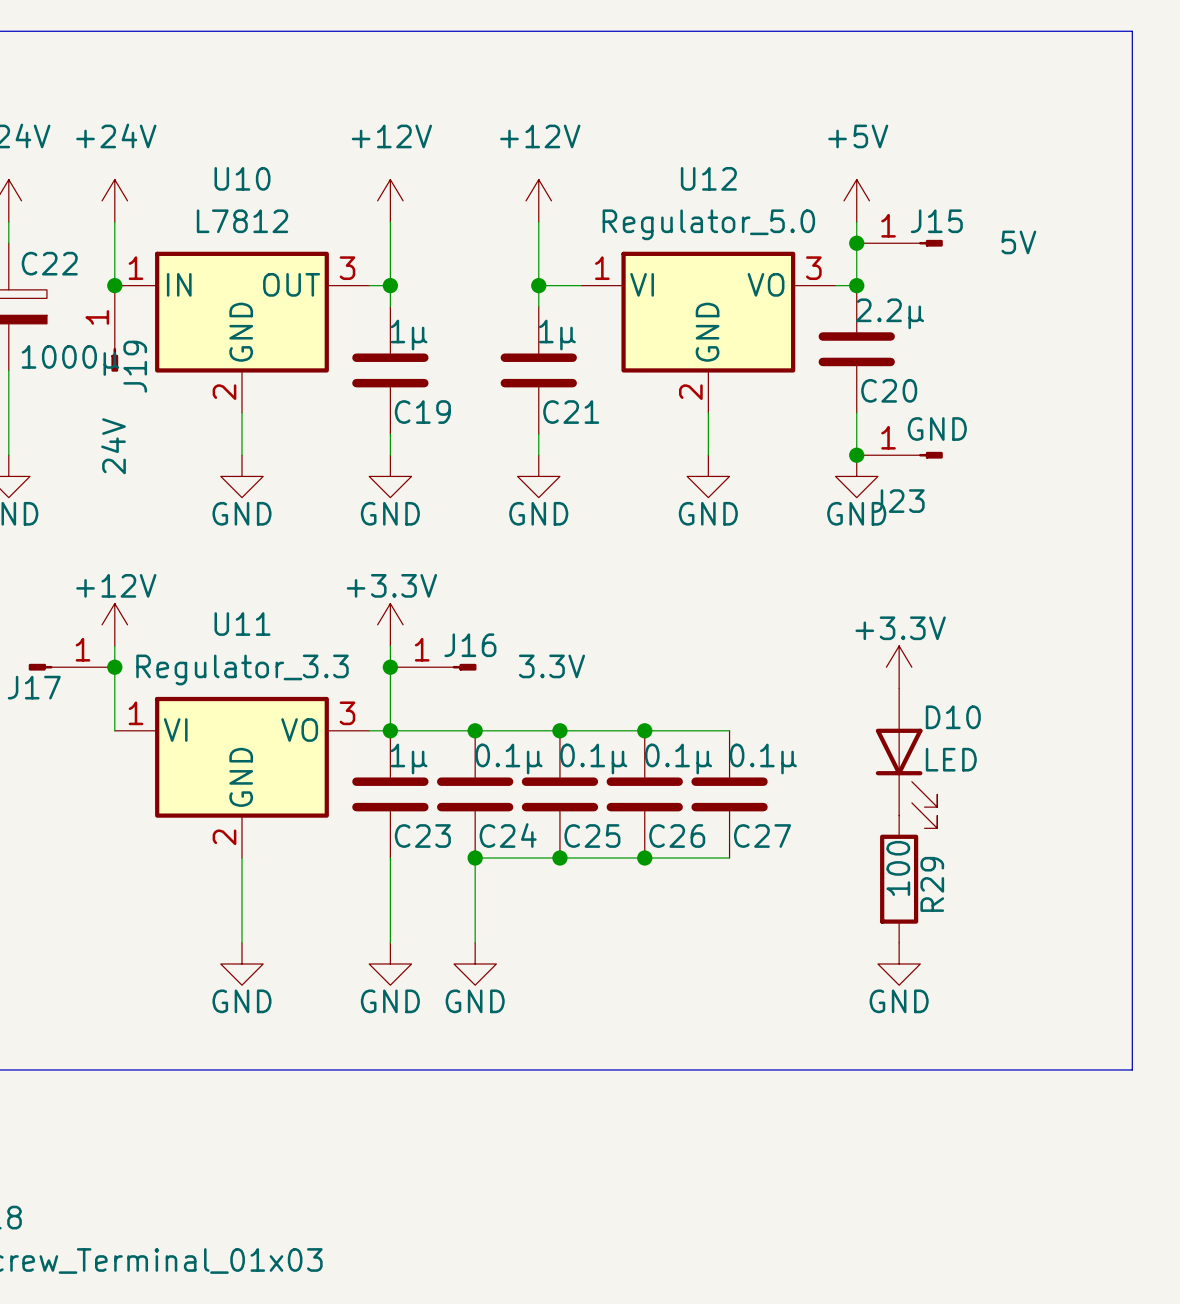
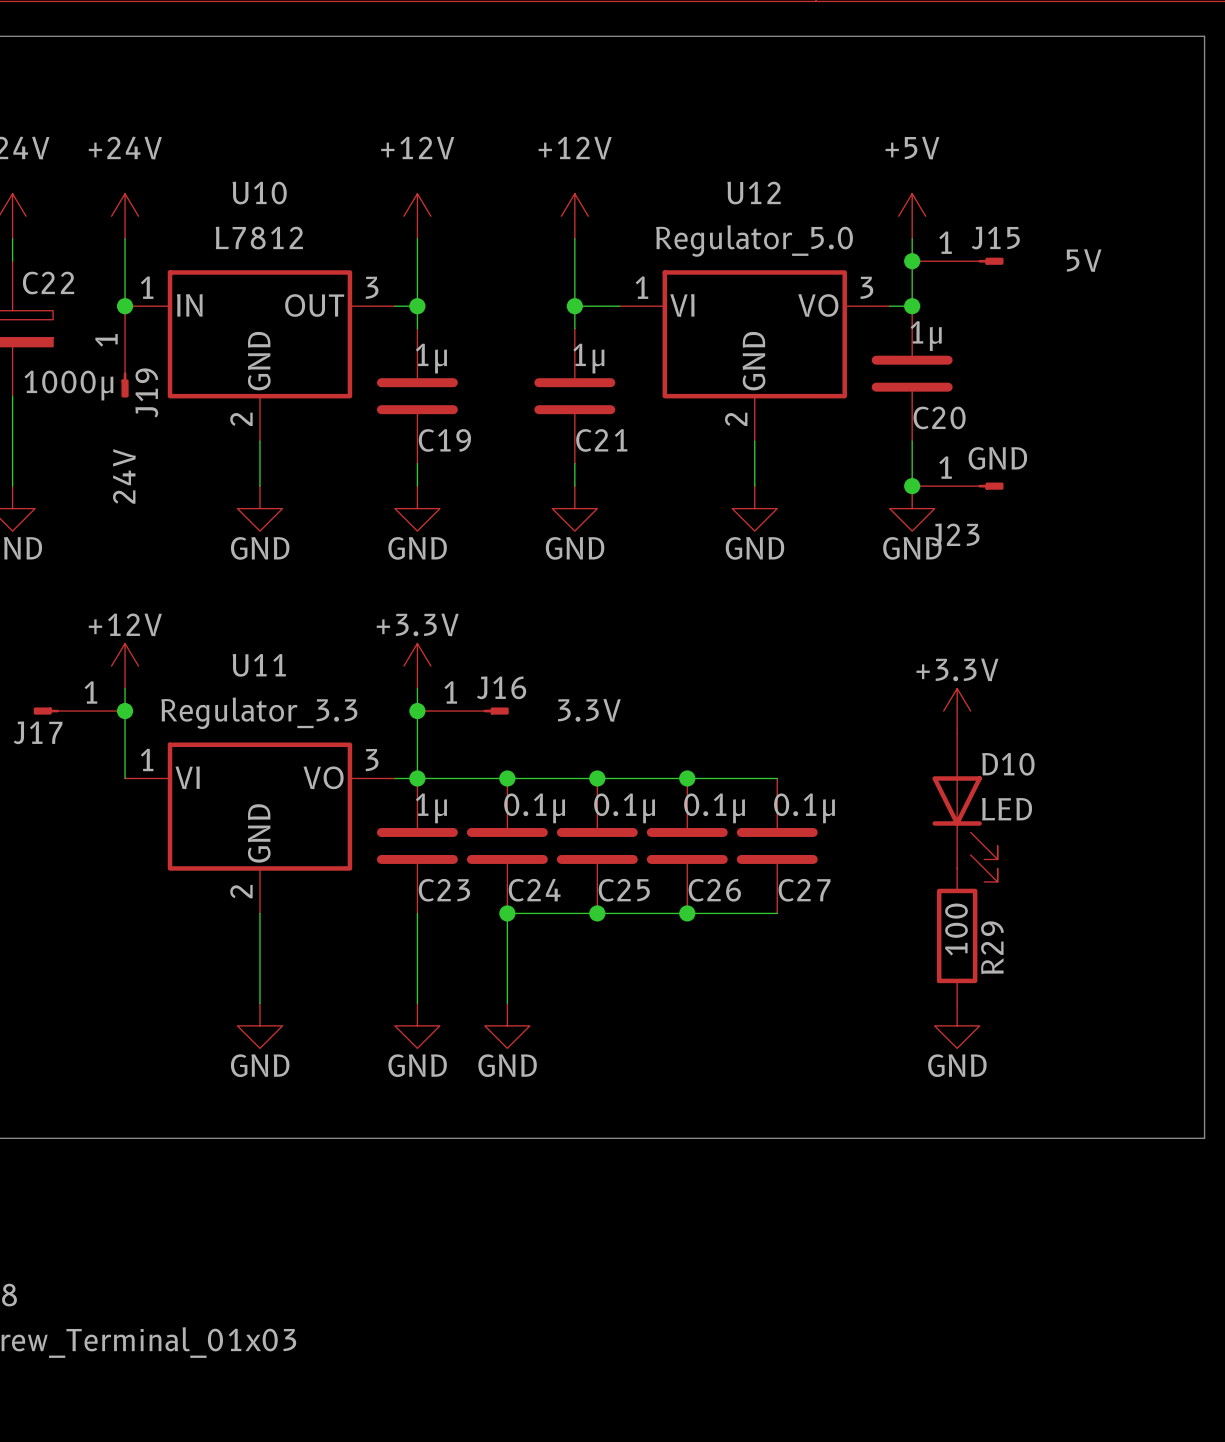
C20 value: 2.2μ (890, 313) -> 1μ (926, 336)

